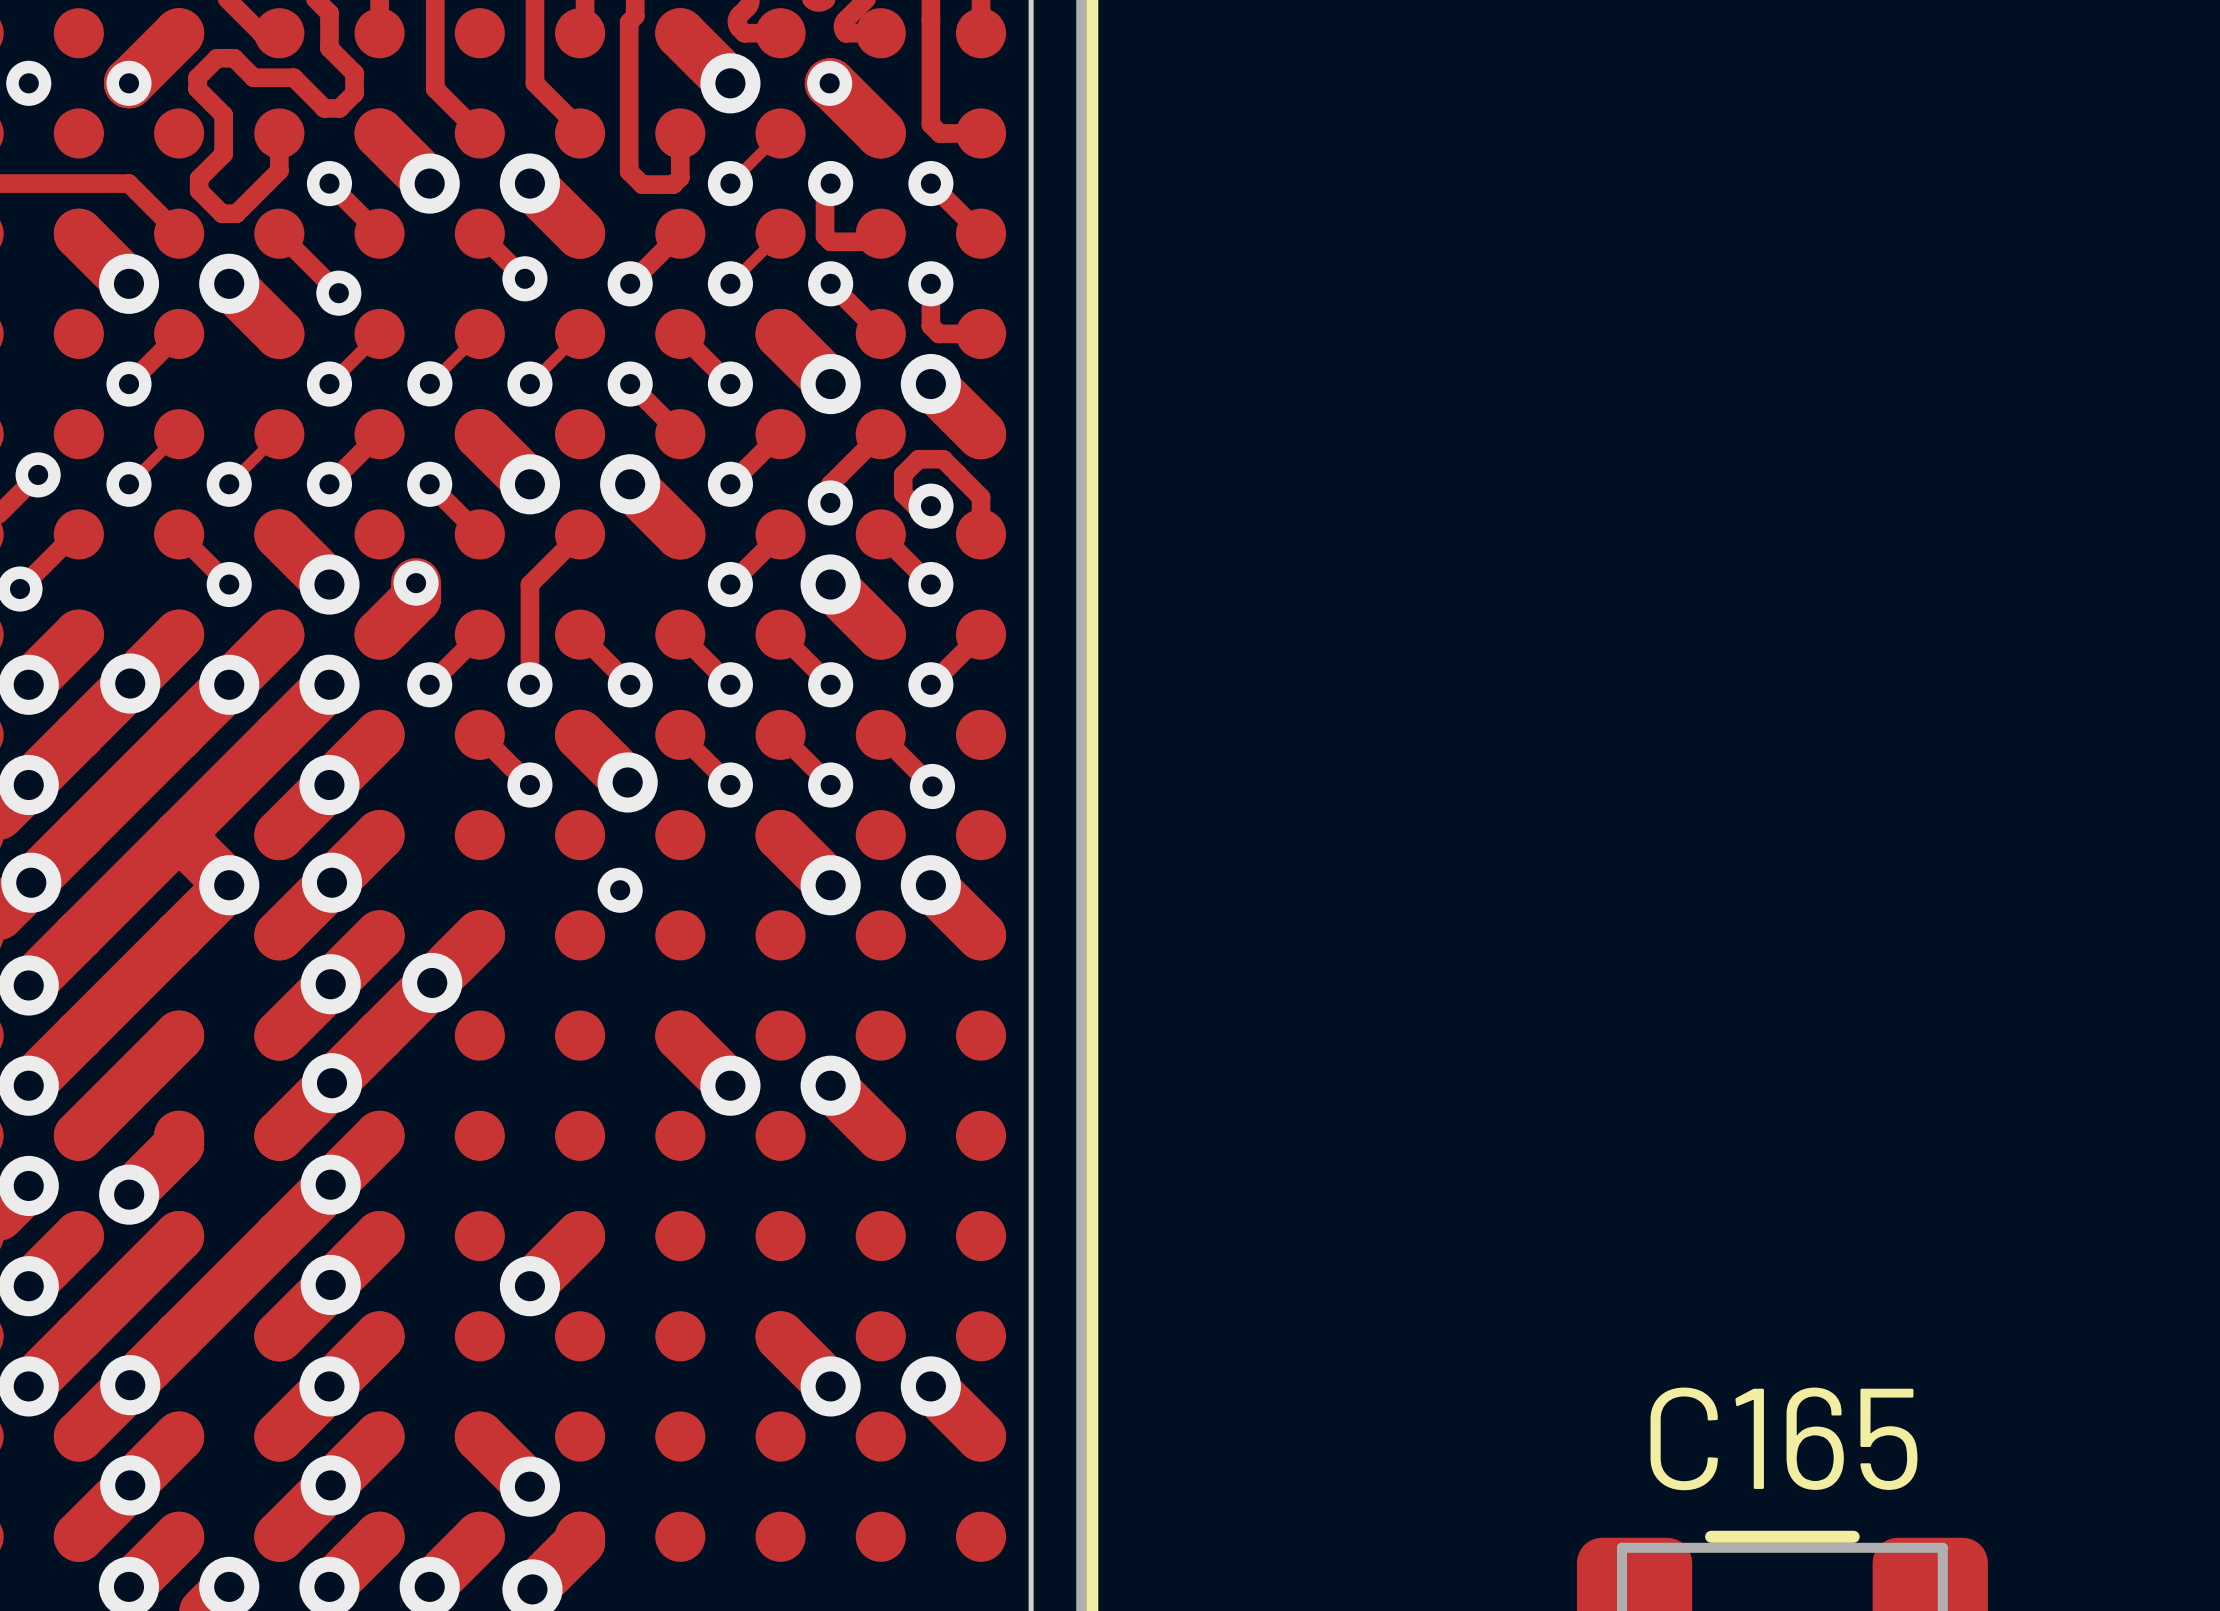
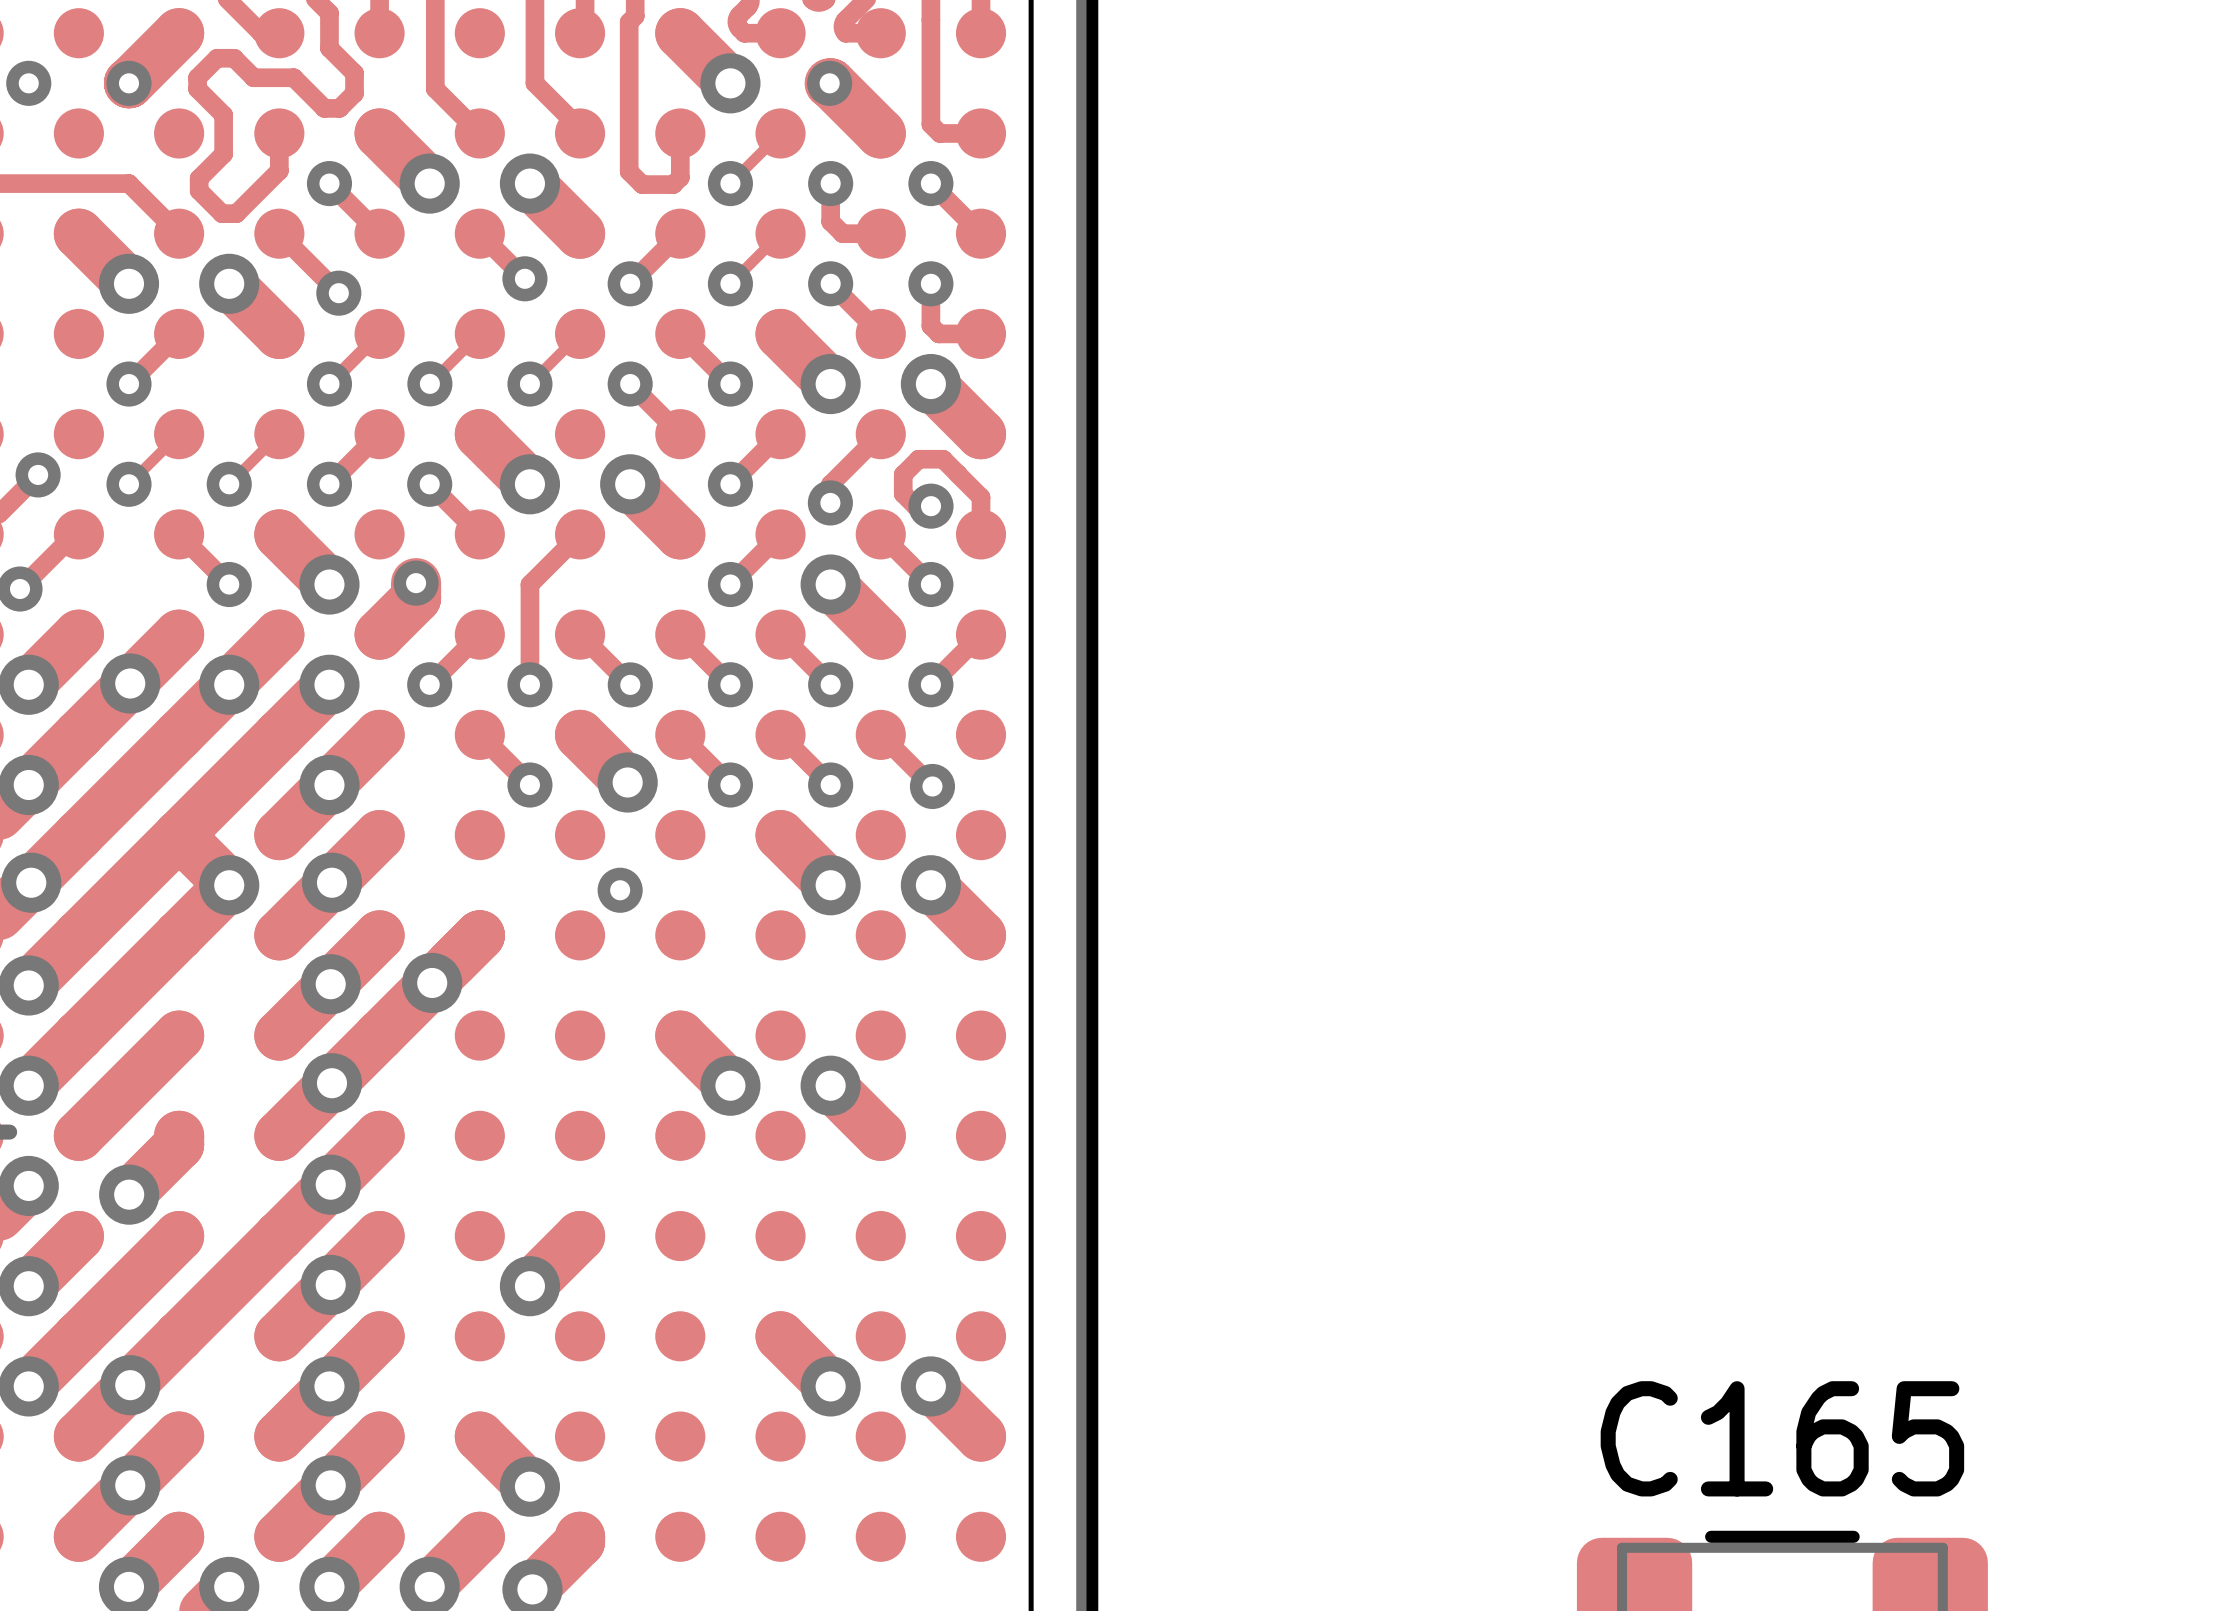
track: (830, 183) (825, 189) (825, 236) (830, 241) (872, 241) (880, 233) -> (830, 183) (830, 221) (842, 233) (880, 233)

